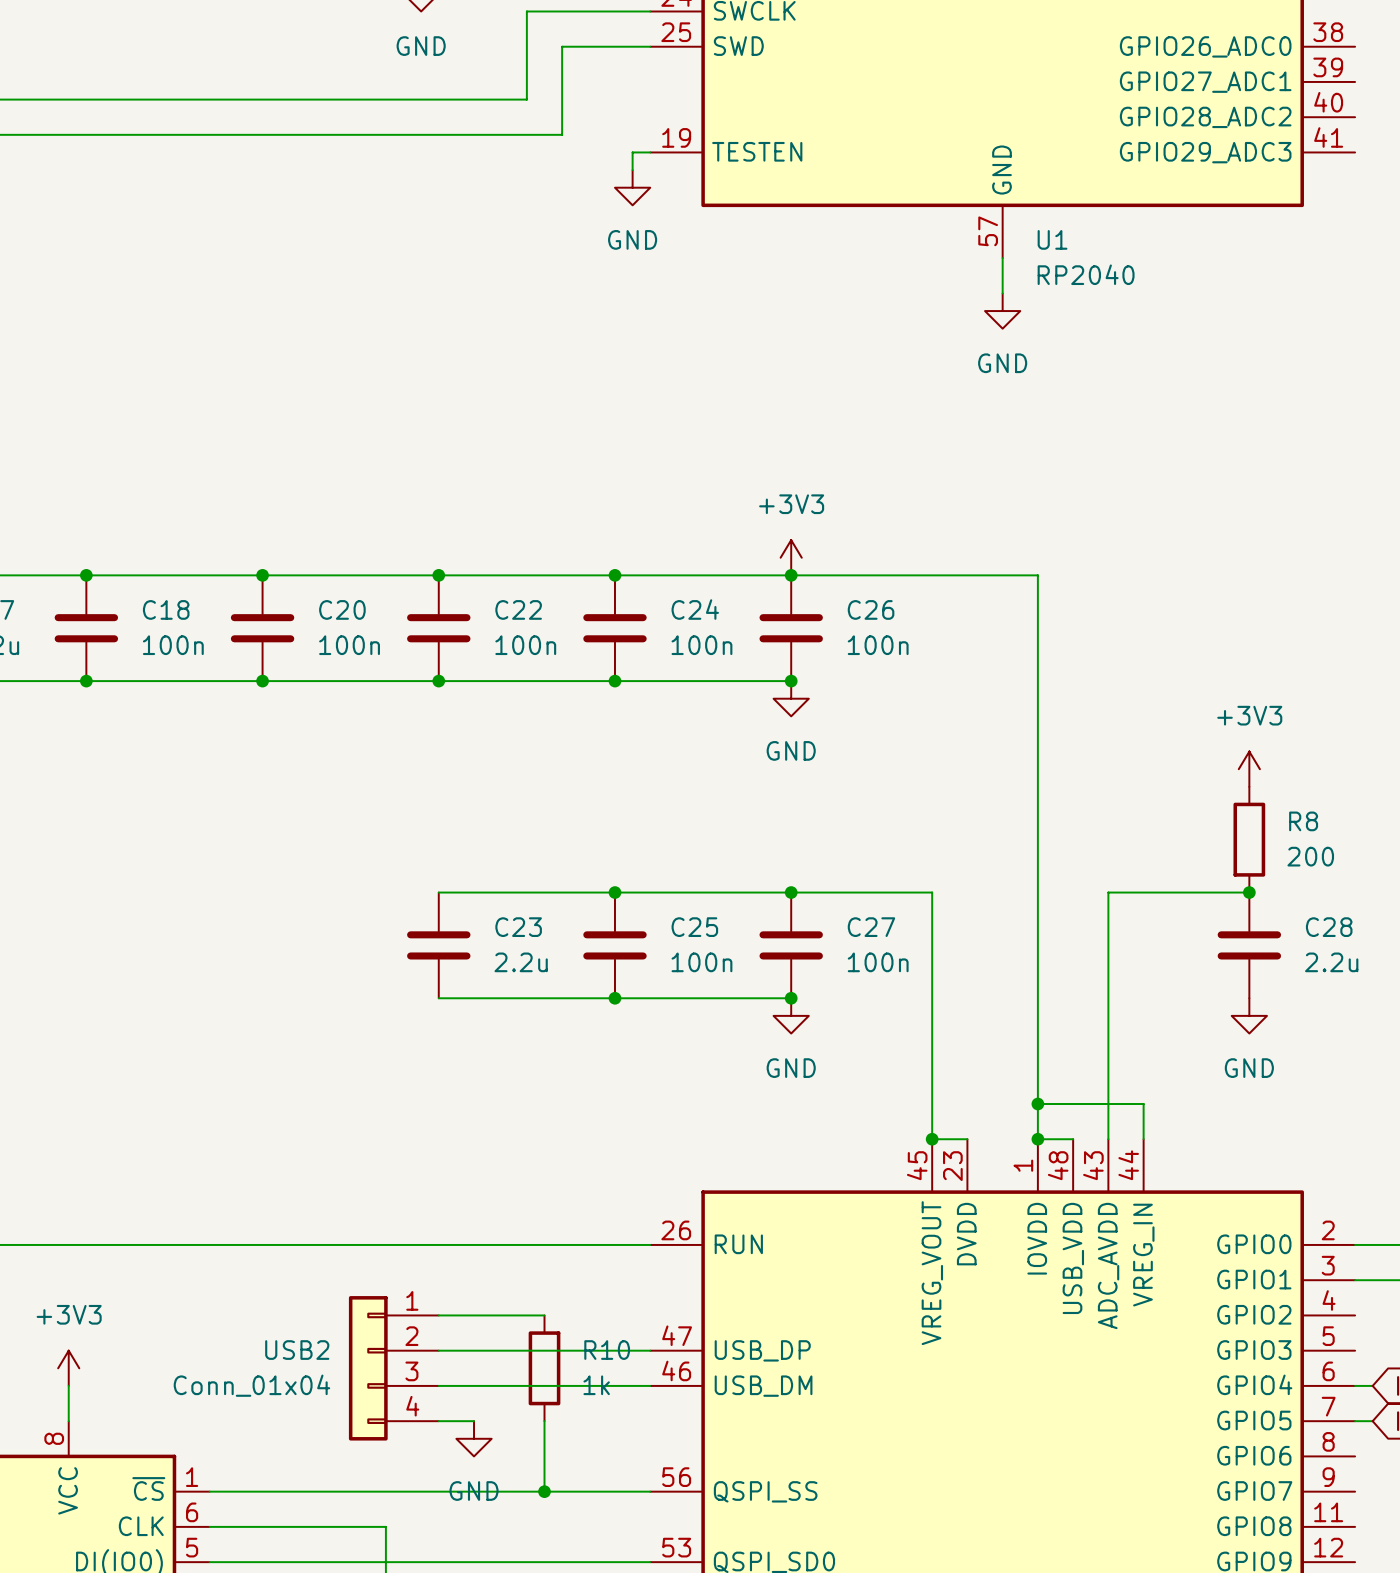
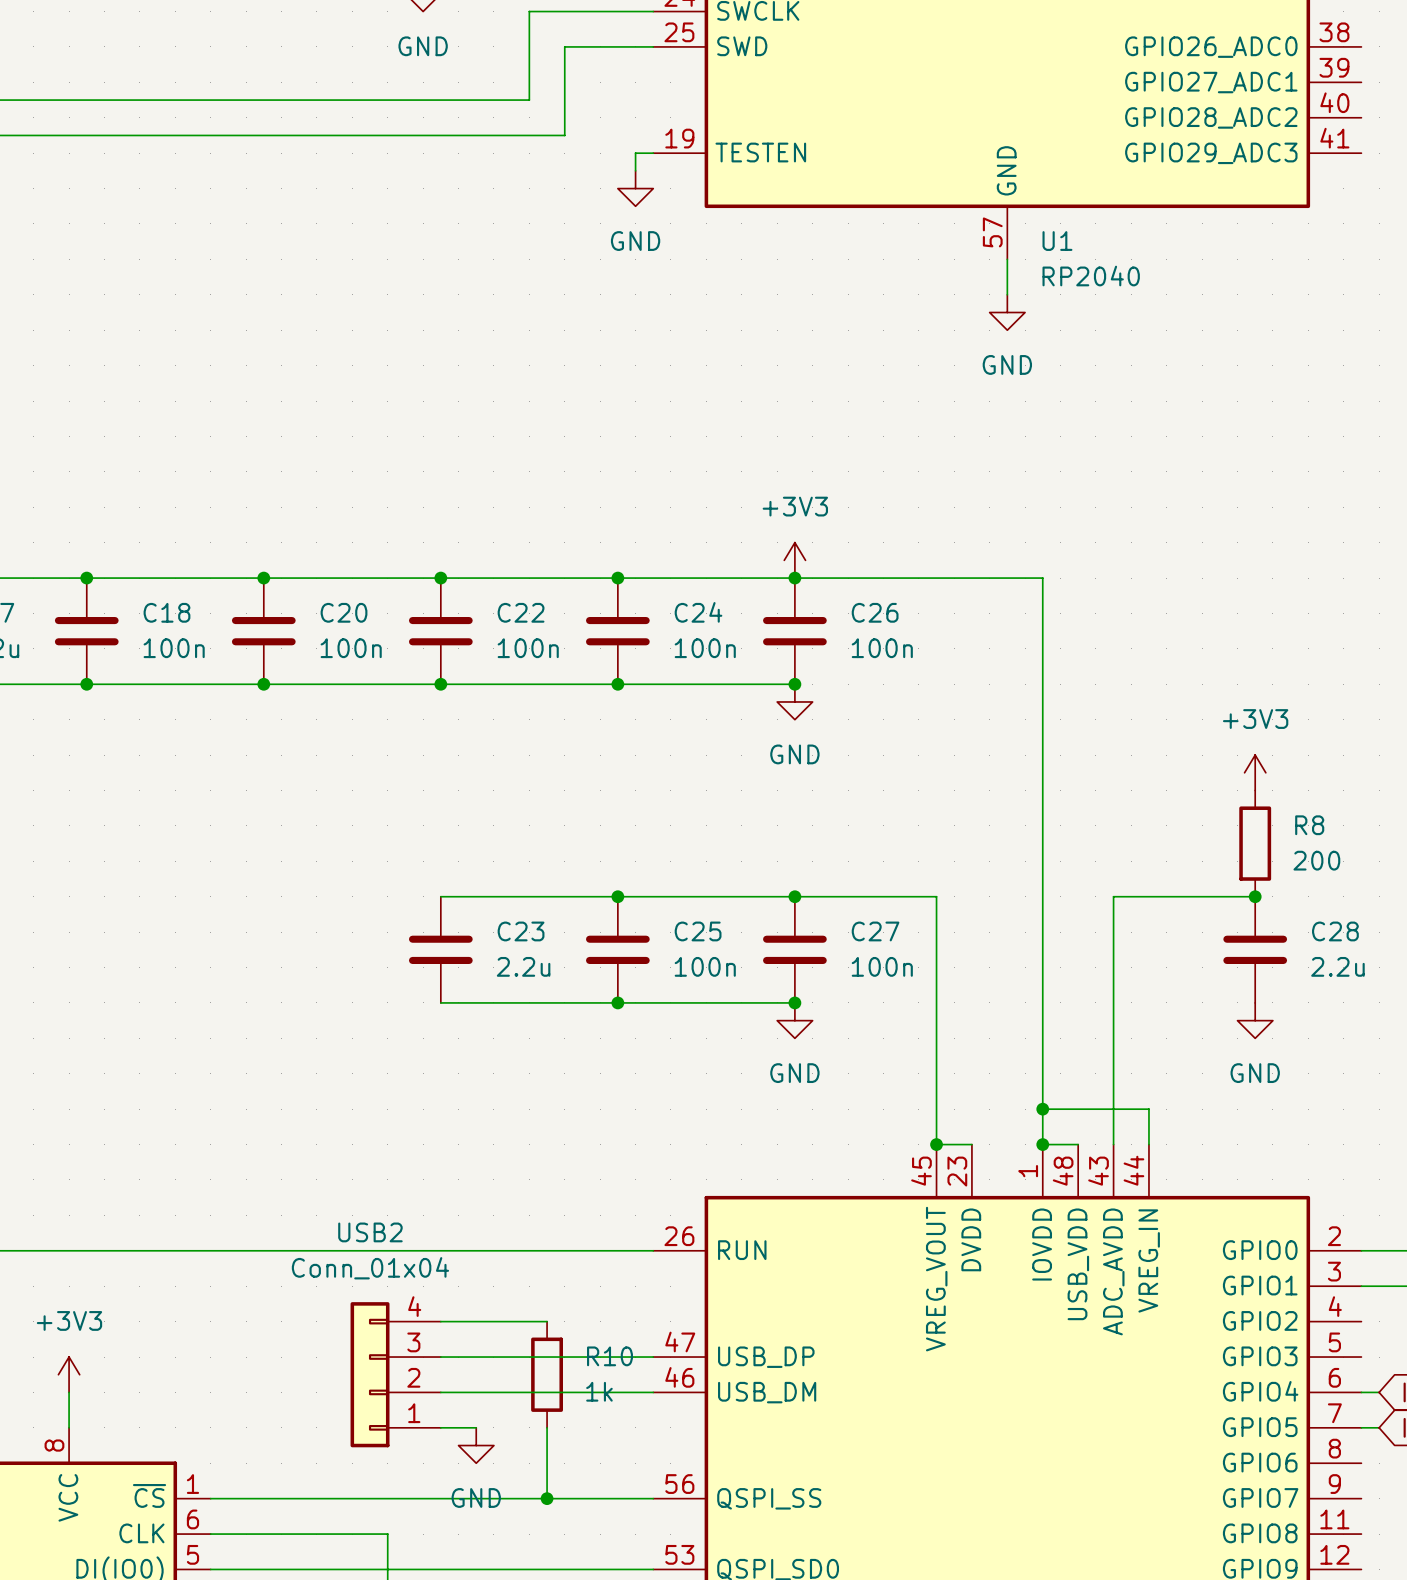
USB2 name position: USB2 (297, 1350) -> USB2 (370, 1232)
USB2 flip: as is (368, 1368) -> up-down (370, 1374)
USB2 value position: Conn_01x04 (251, 1385) -> Conn_01x04 (370, 1268)

